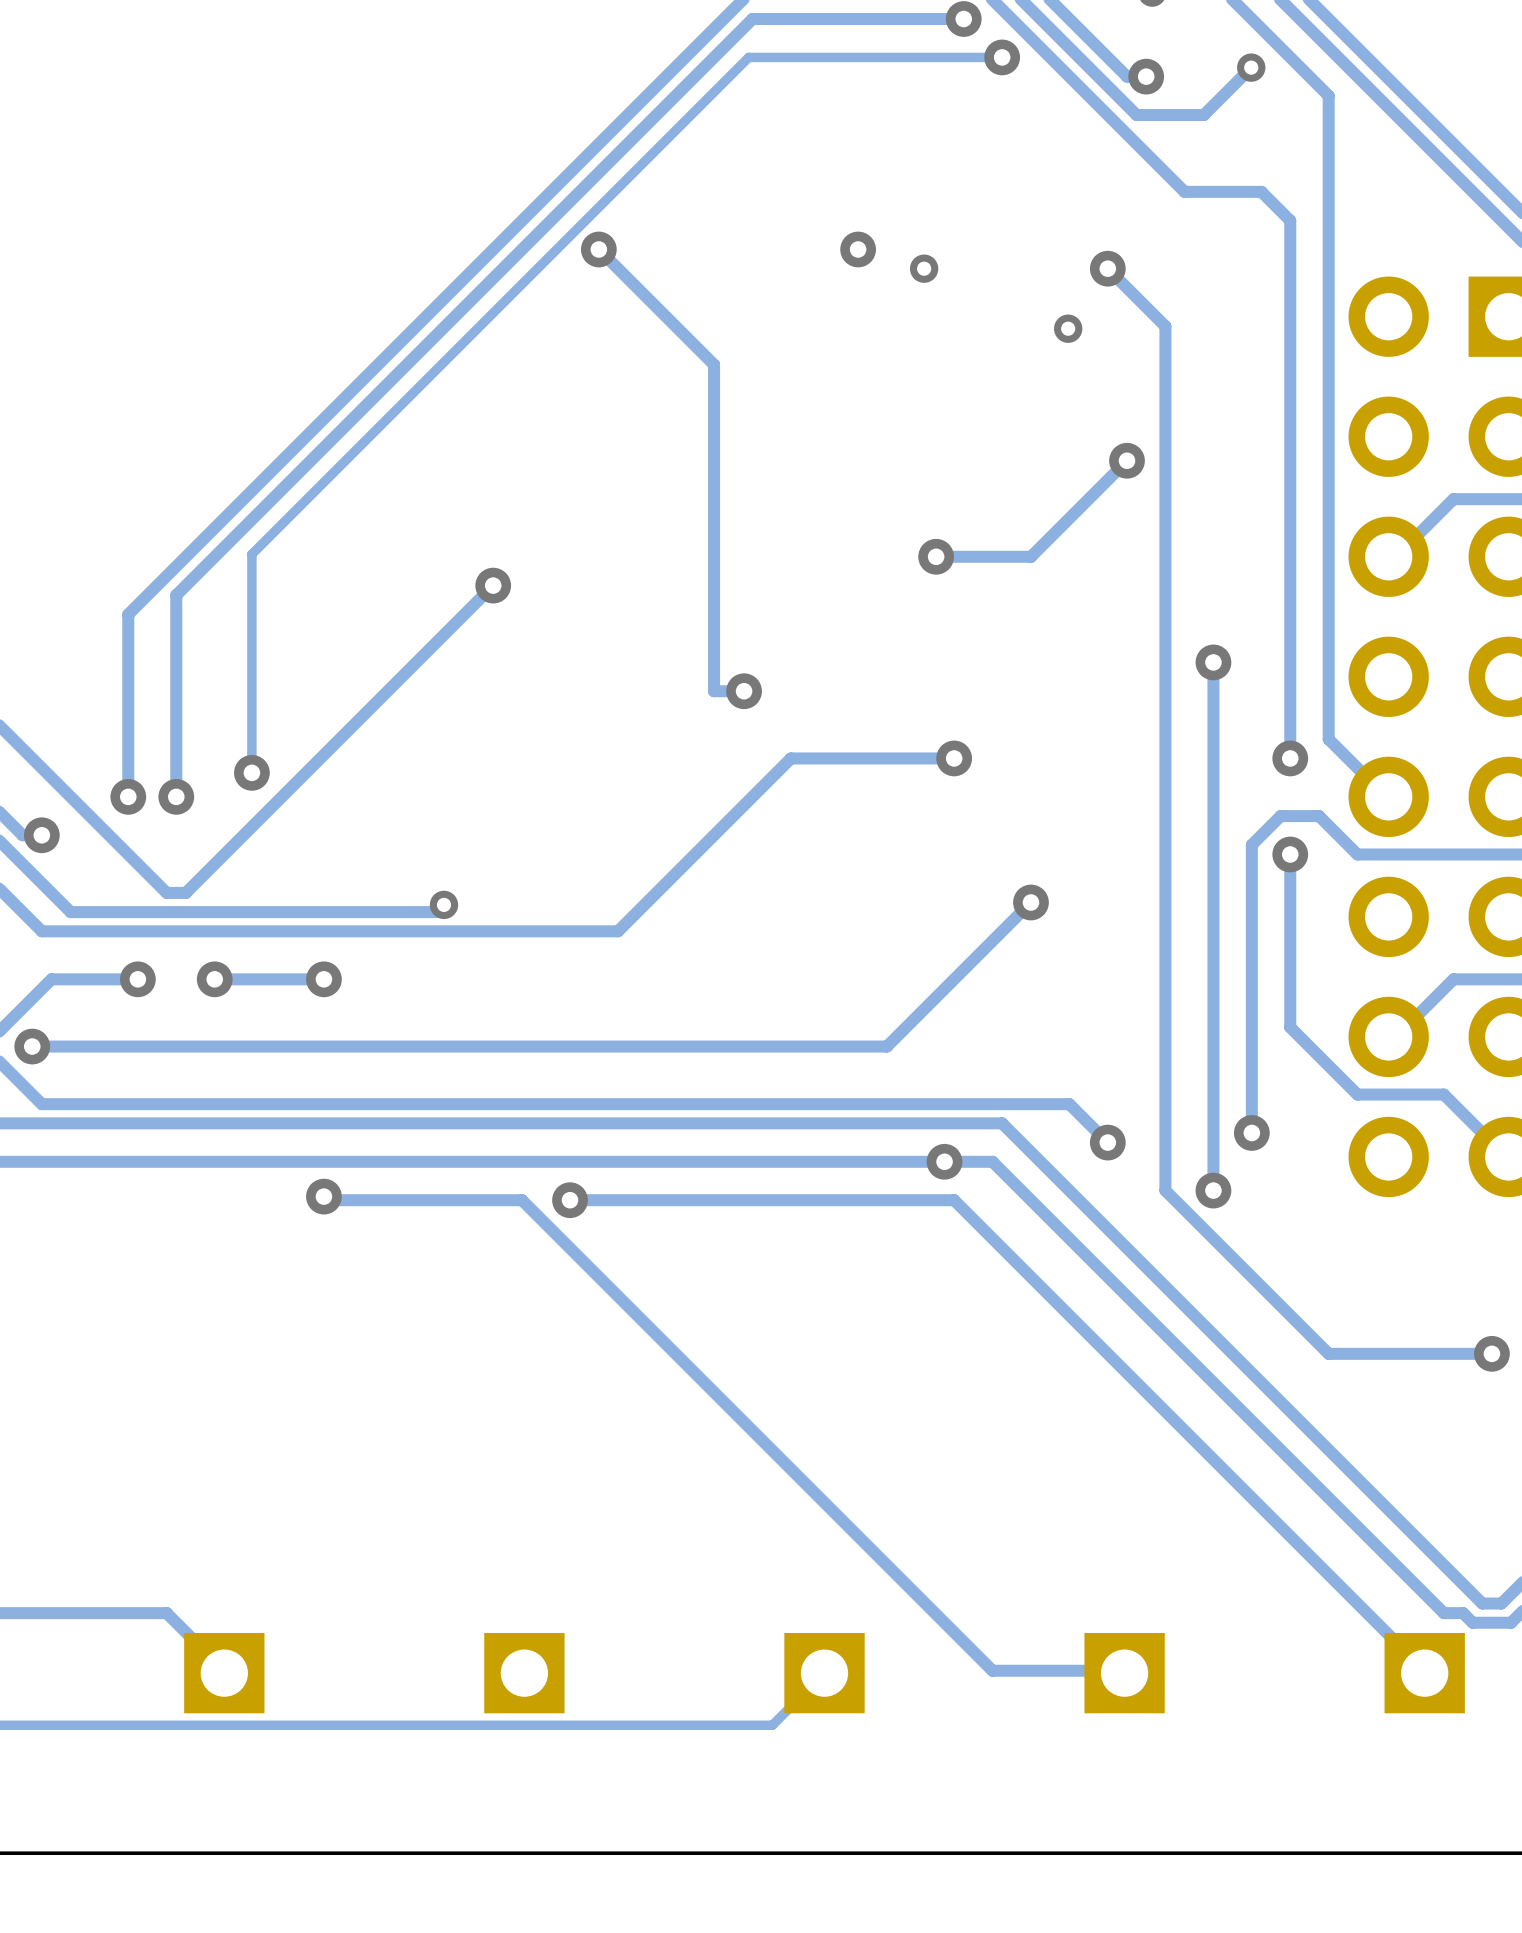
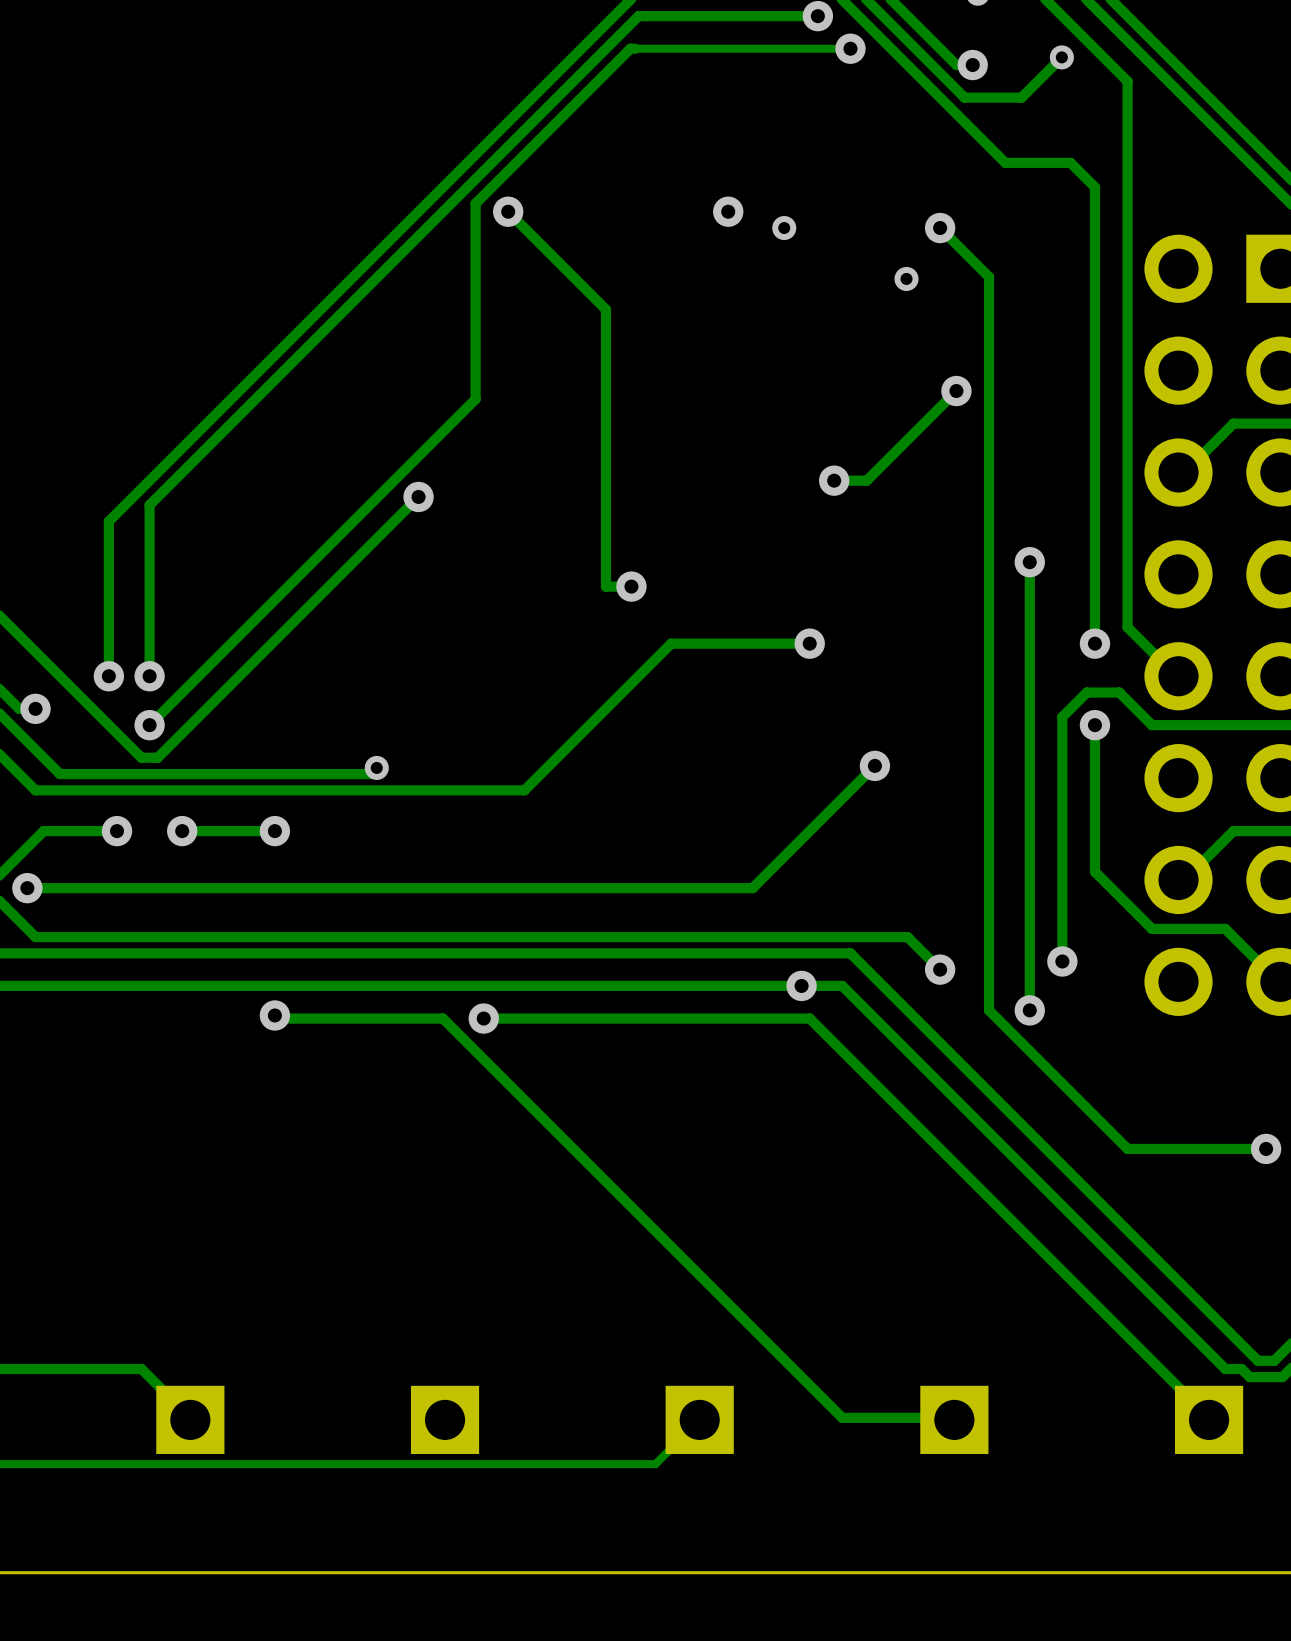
track: (748, 57) (251, 554) (251, 772) -> (635, 48) (630, 48) (475, 203) (475, 399) (149, 725)
via position: (936, 556) -> (834, 480)
track: (1030, 556) (936, 556) -> (874, 472) (866, 480) (834, 480)
via position: (251, 772) -> (149, 725)

